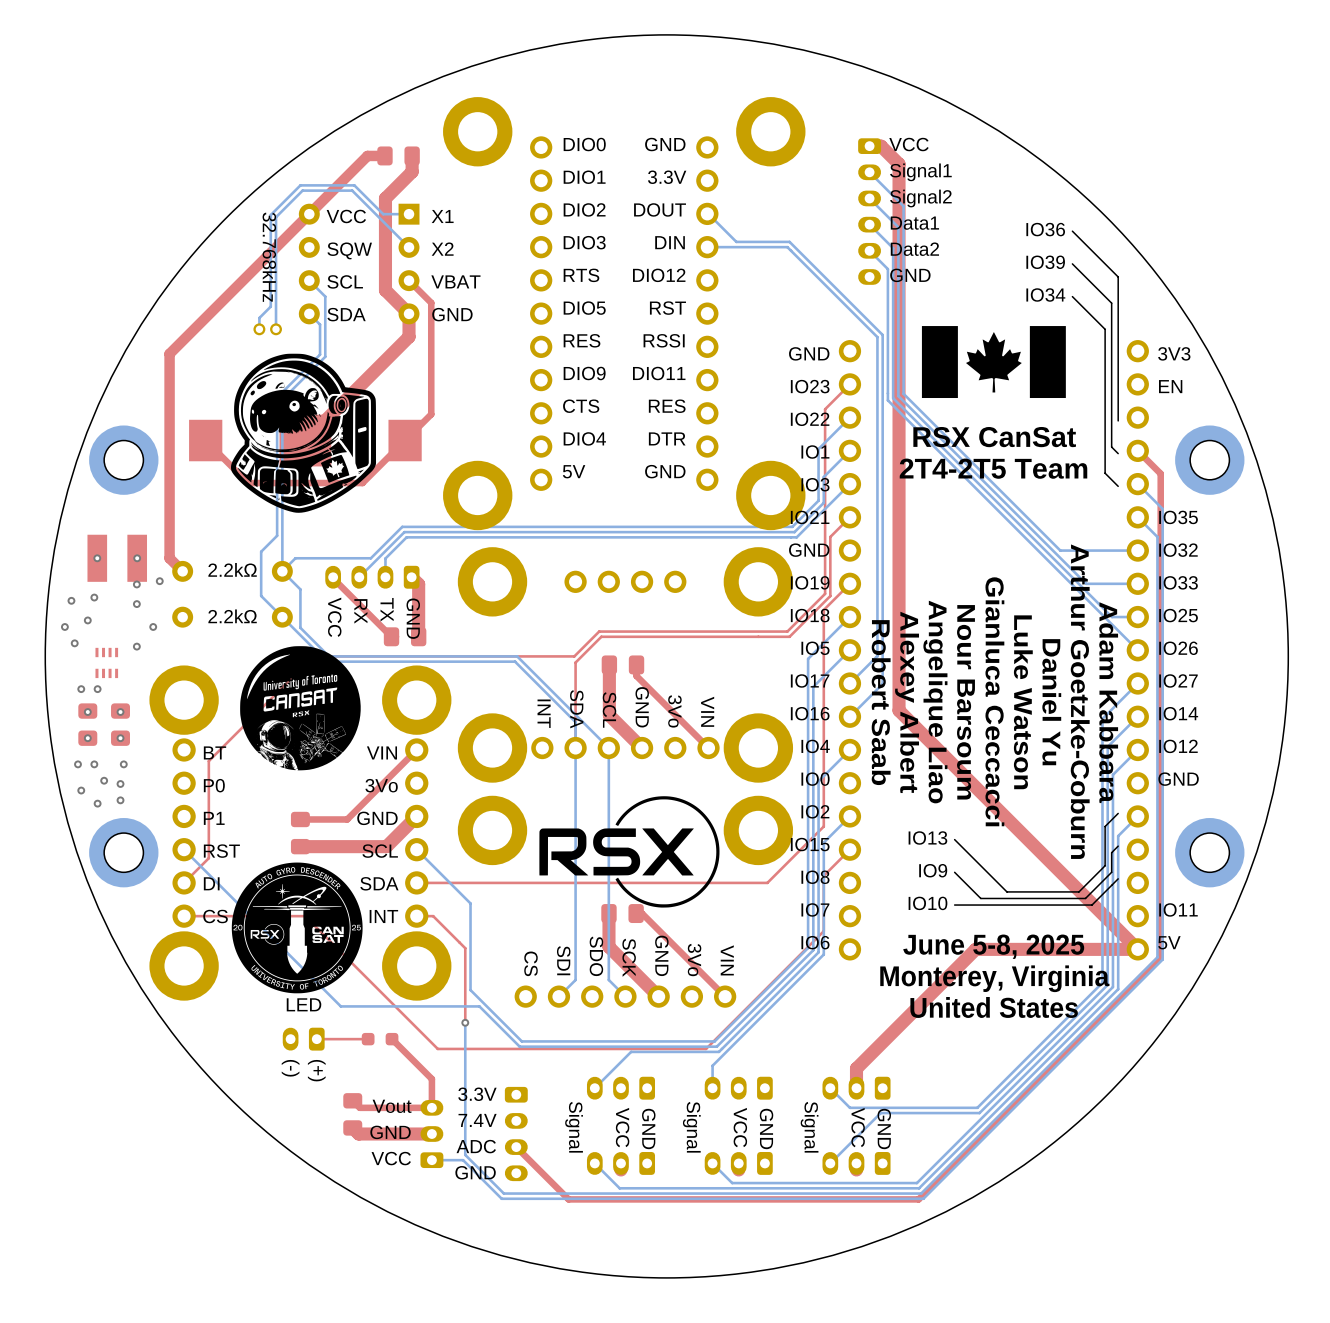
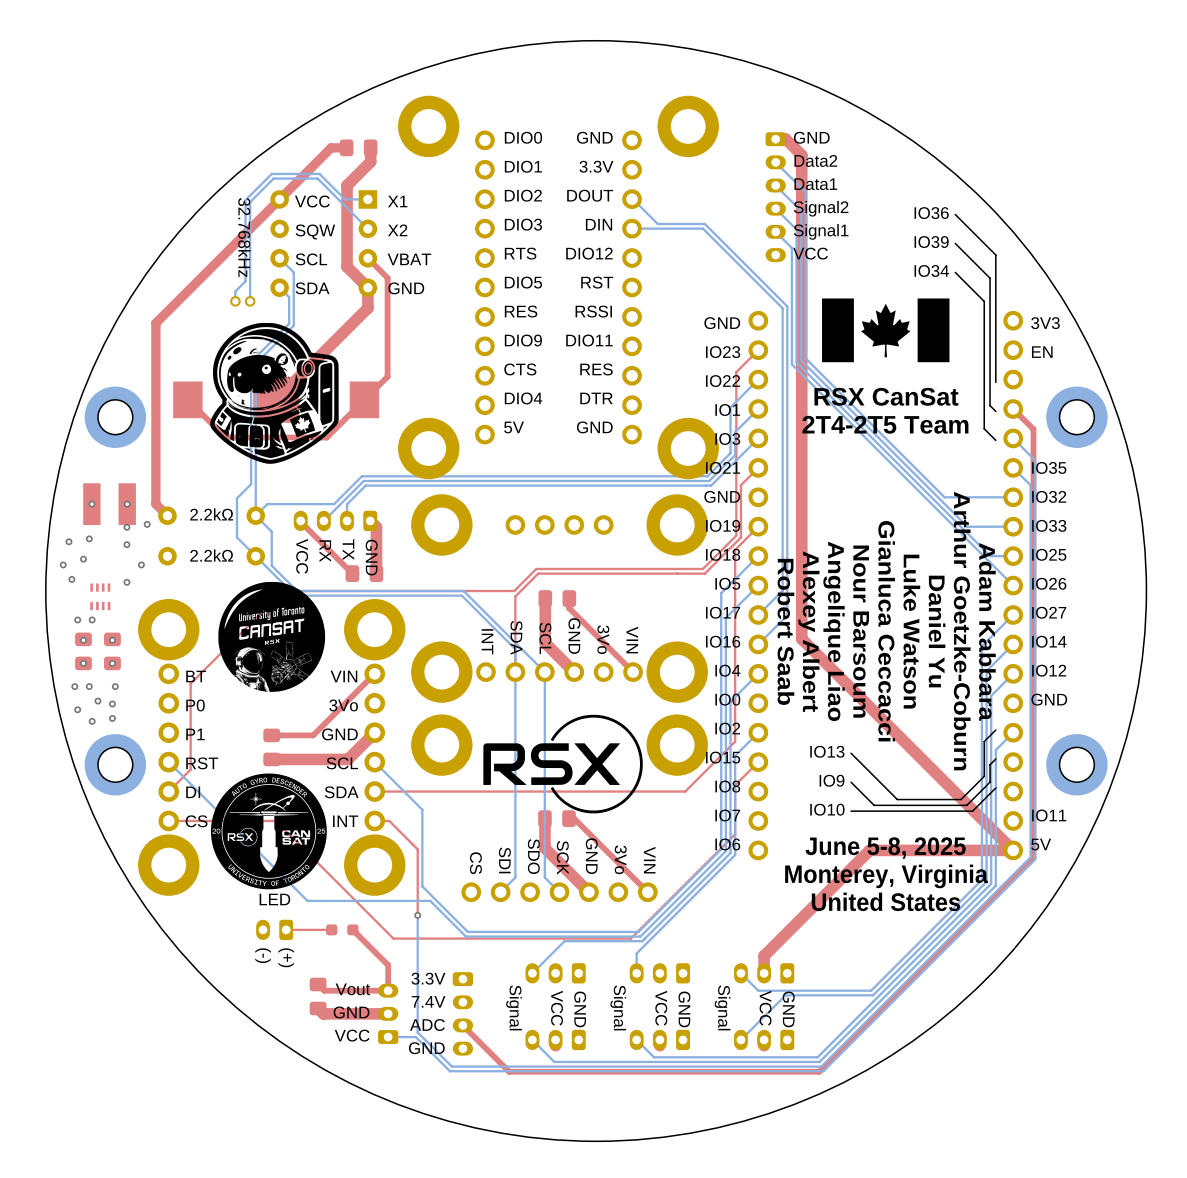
text: VCC (908, 144) -> GND (811, 137)
text: Signal1 (920, 172) -> Data2 (815, 160)
text: Signal2 (920, 198) -> Data1 (815, 184)
text: Data1 (914, 223) -> Signal2 (821, 208)
text: Data2 (914, 249) -> Signal1 (821, 231)
text: GND (910, 275) -> VCC (810, 253)

